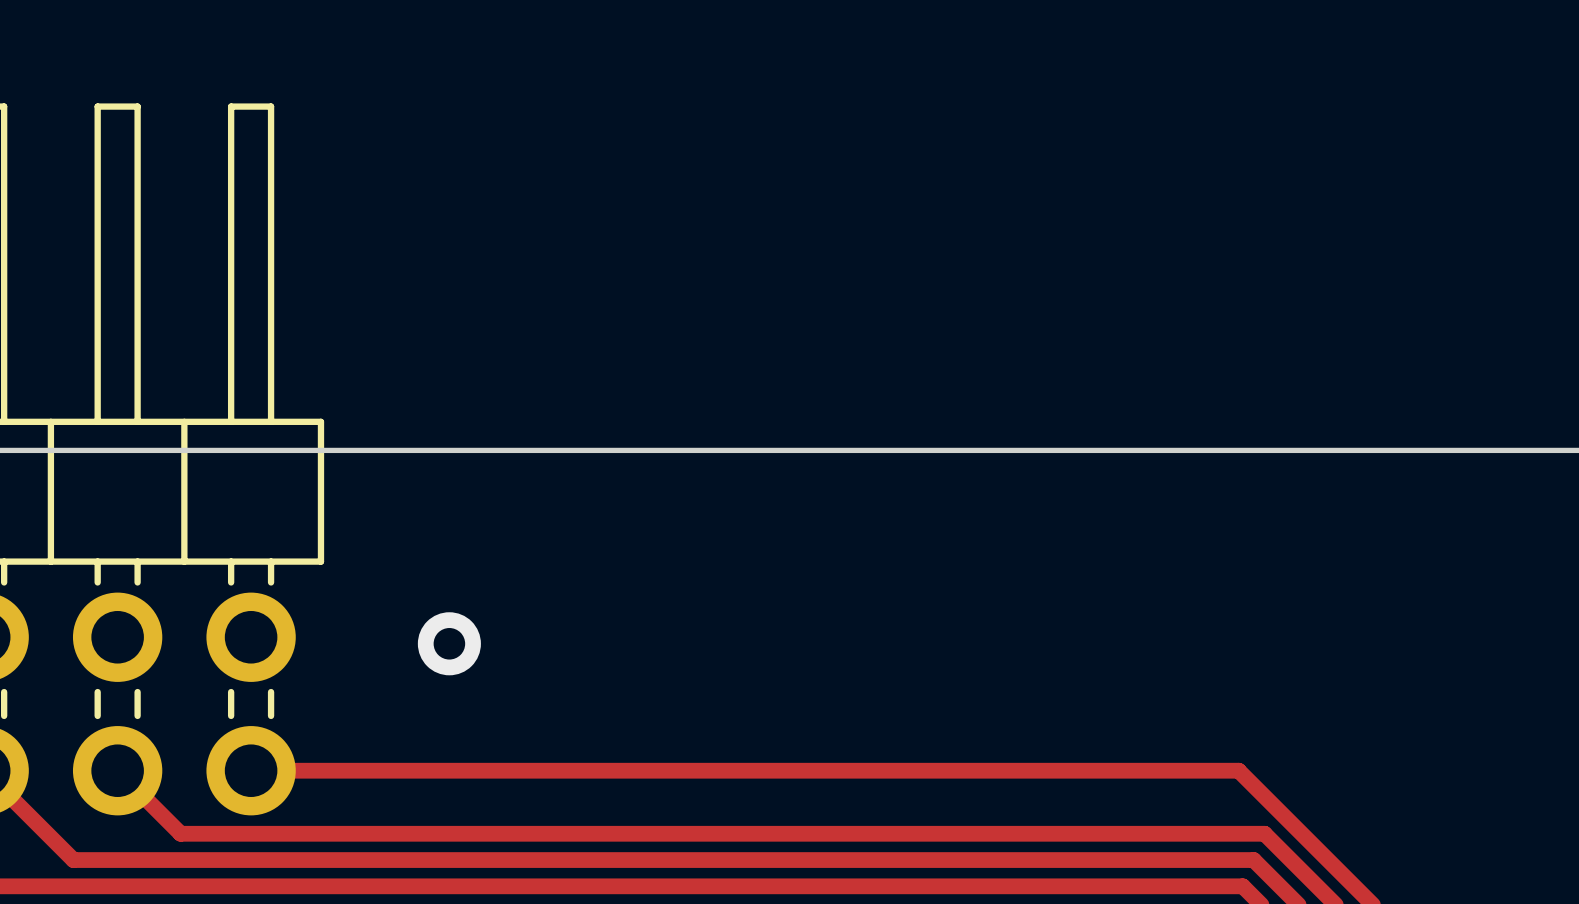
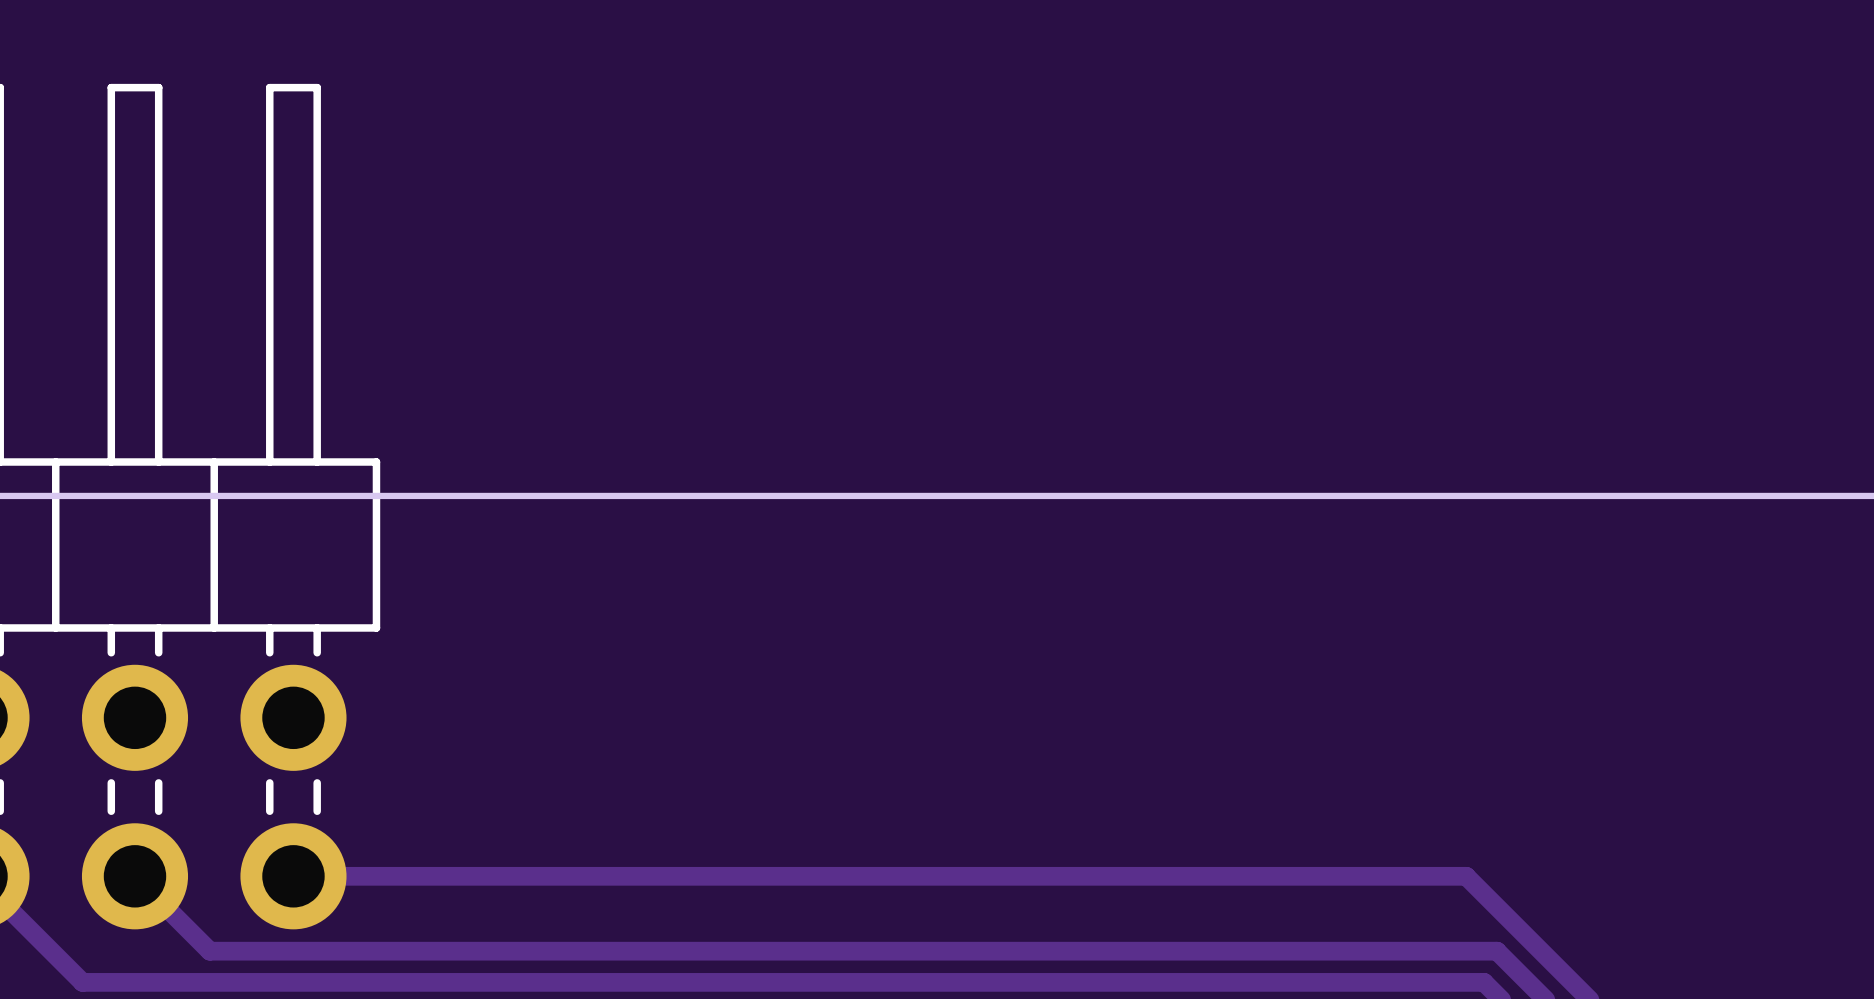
via: (449, 643) -> none

